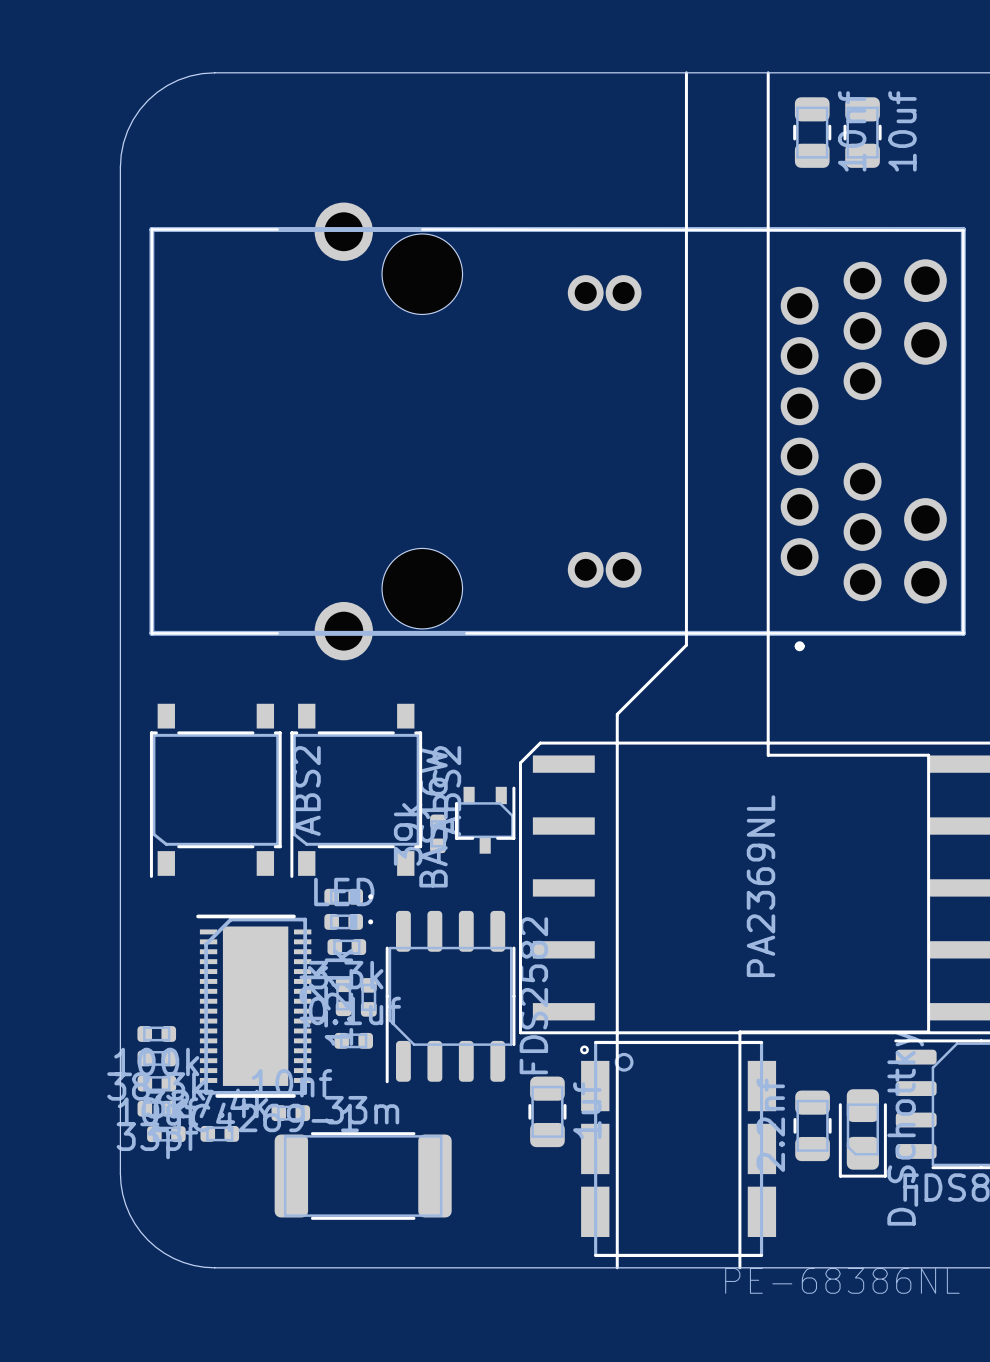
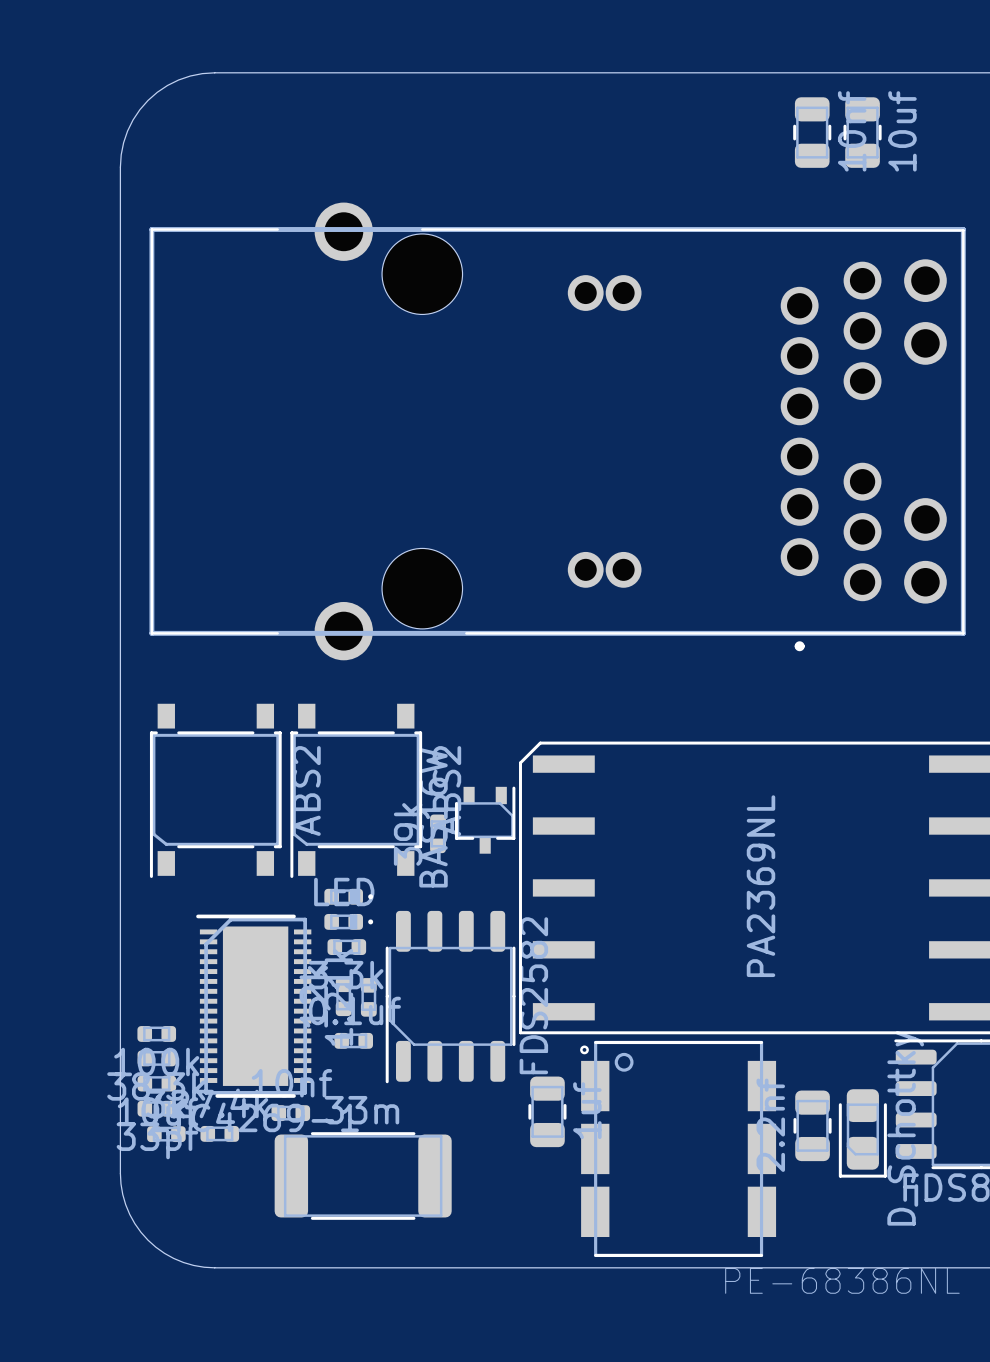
line: (686, 72) (686, 645) (617, 714) (617, 1267) -> none
line: (768, 72) (768, 755) (928, 755) (928, 1031) (739, 1031) (739, 1267) -> none

